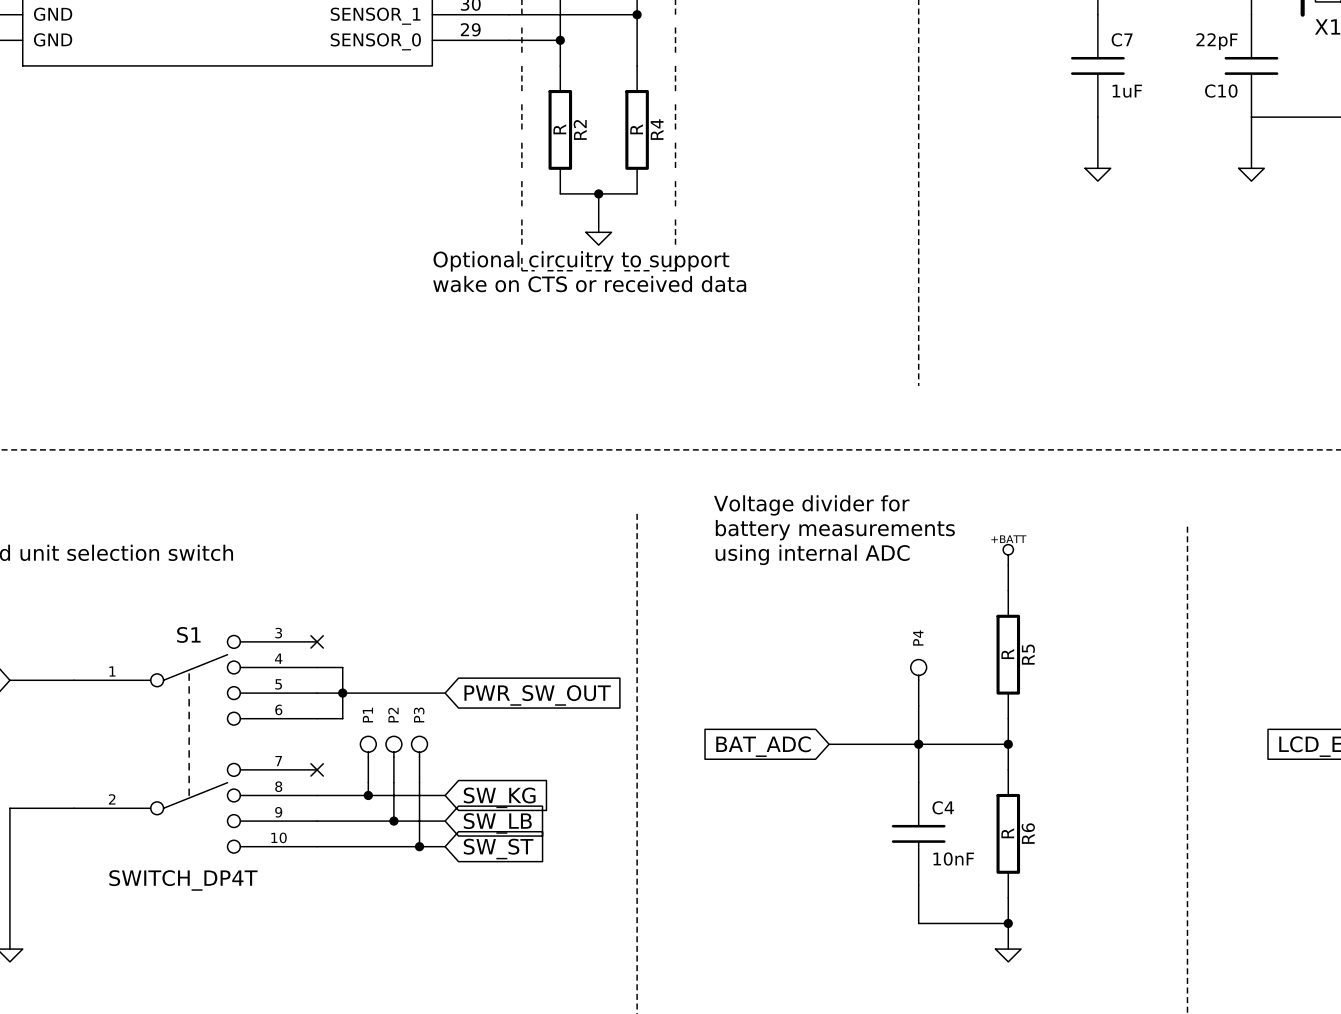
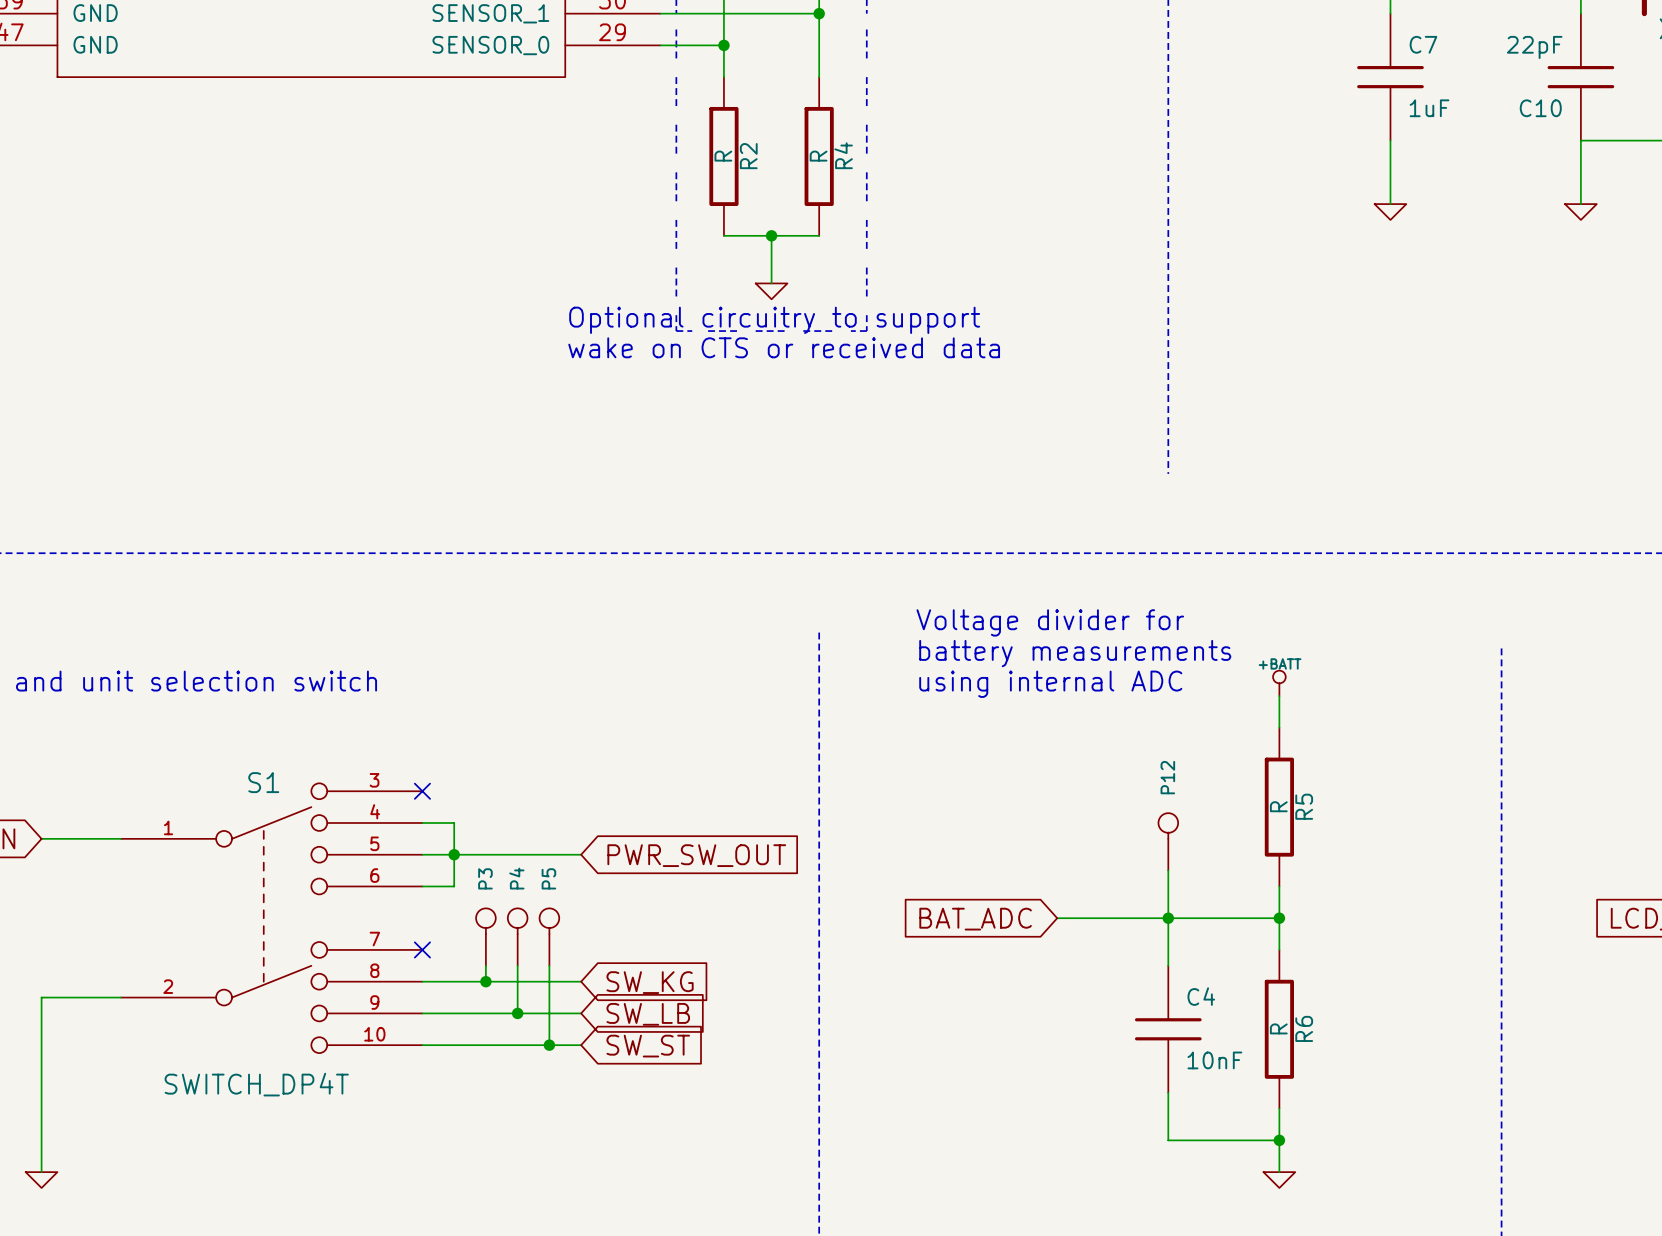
P4 name: P4 (918, 638) -> P12 (1167, 777)
P3 name: P3 (419, 714) -> P5 (548, 878)
P1 name: P1 (367, 715) -> P3 (485, 878)
P2 name: P2 (393, 715) -> P4 (516, 878)

